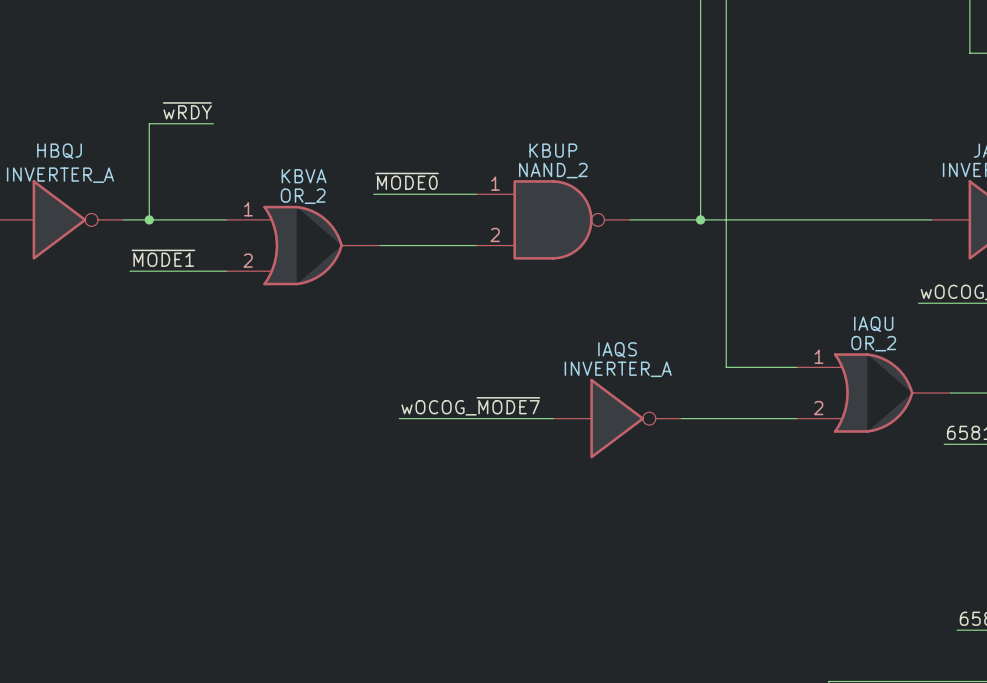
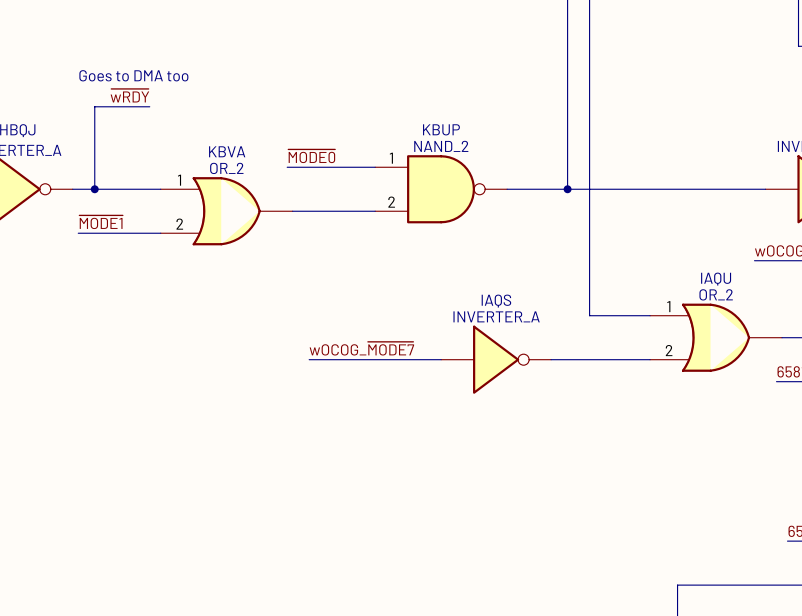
text: none -> Goes to DMA too (133, 75)

